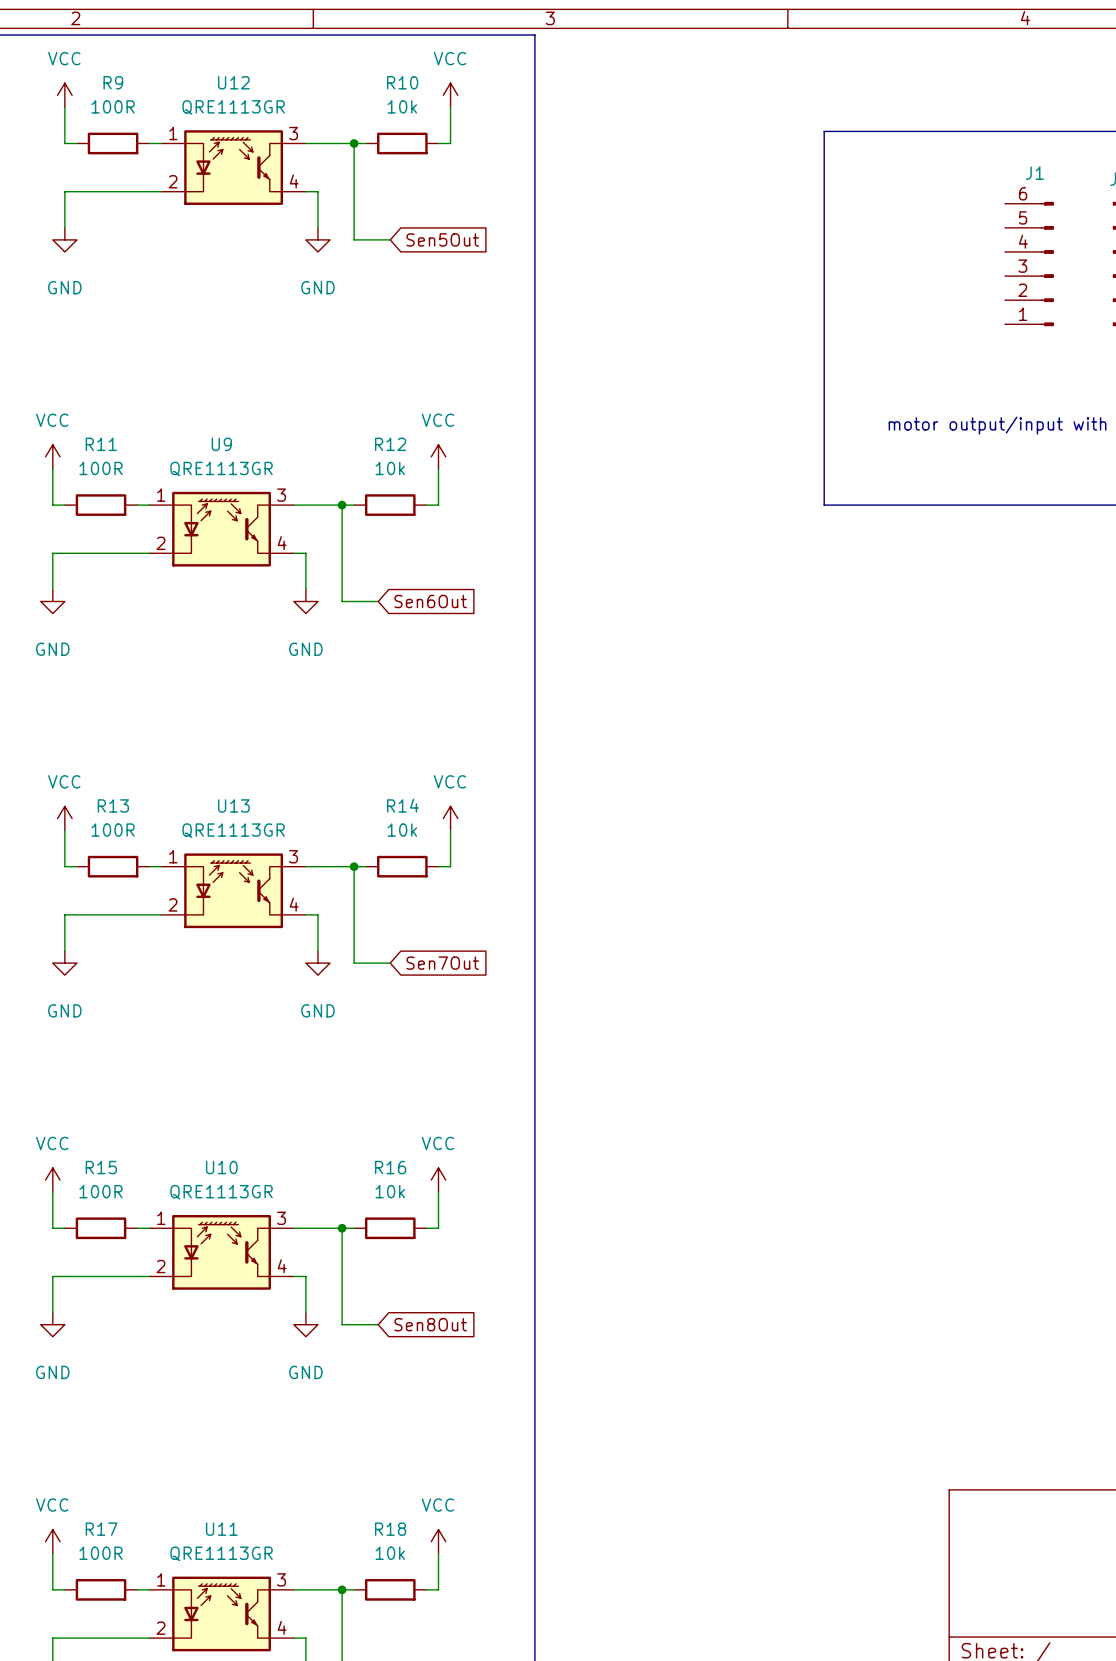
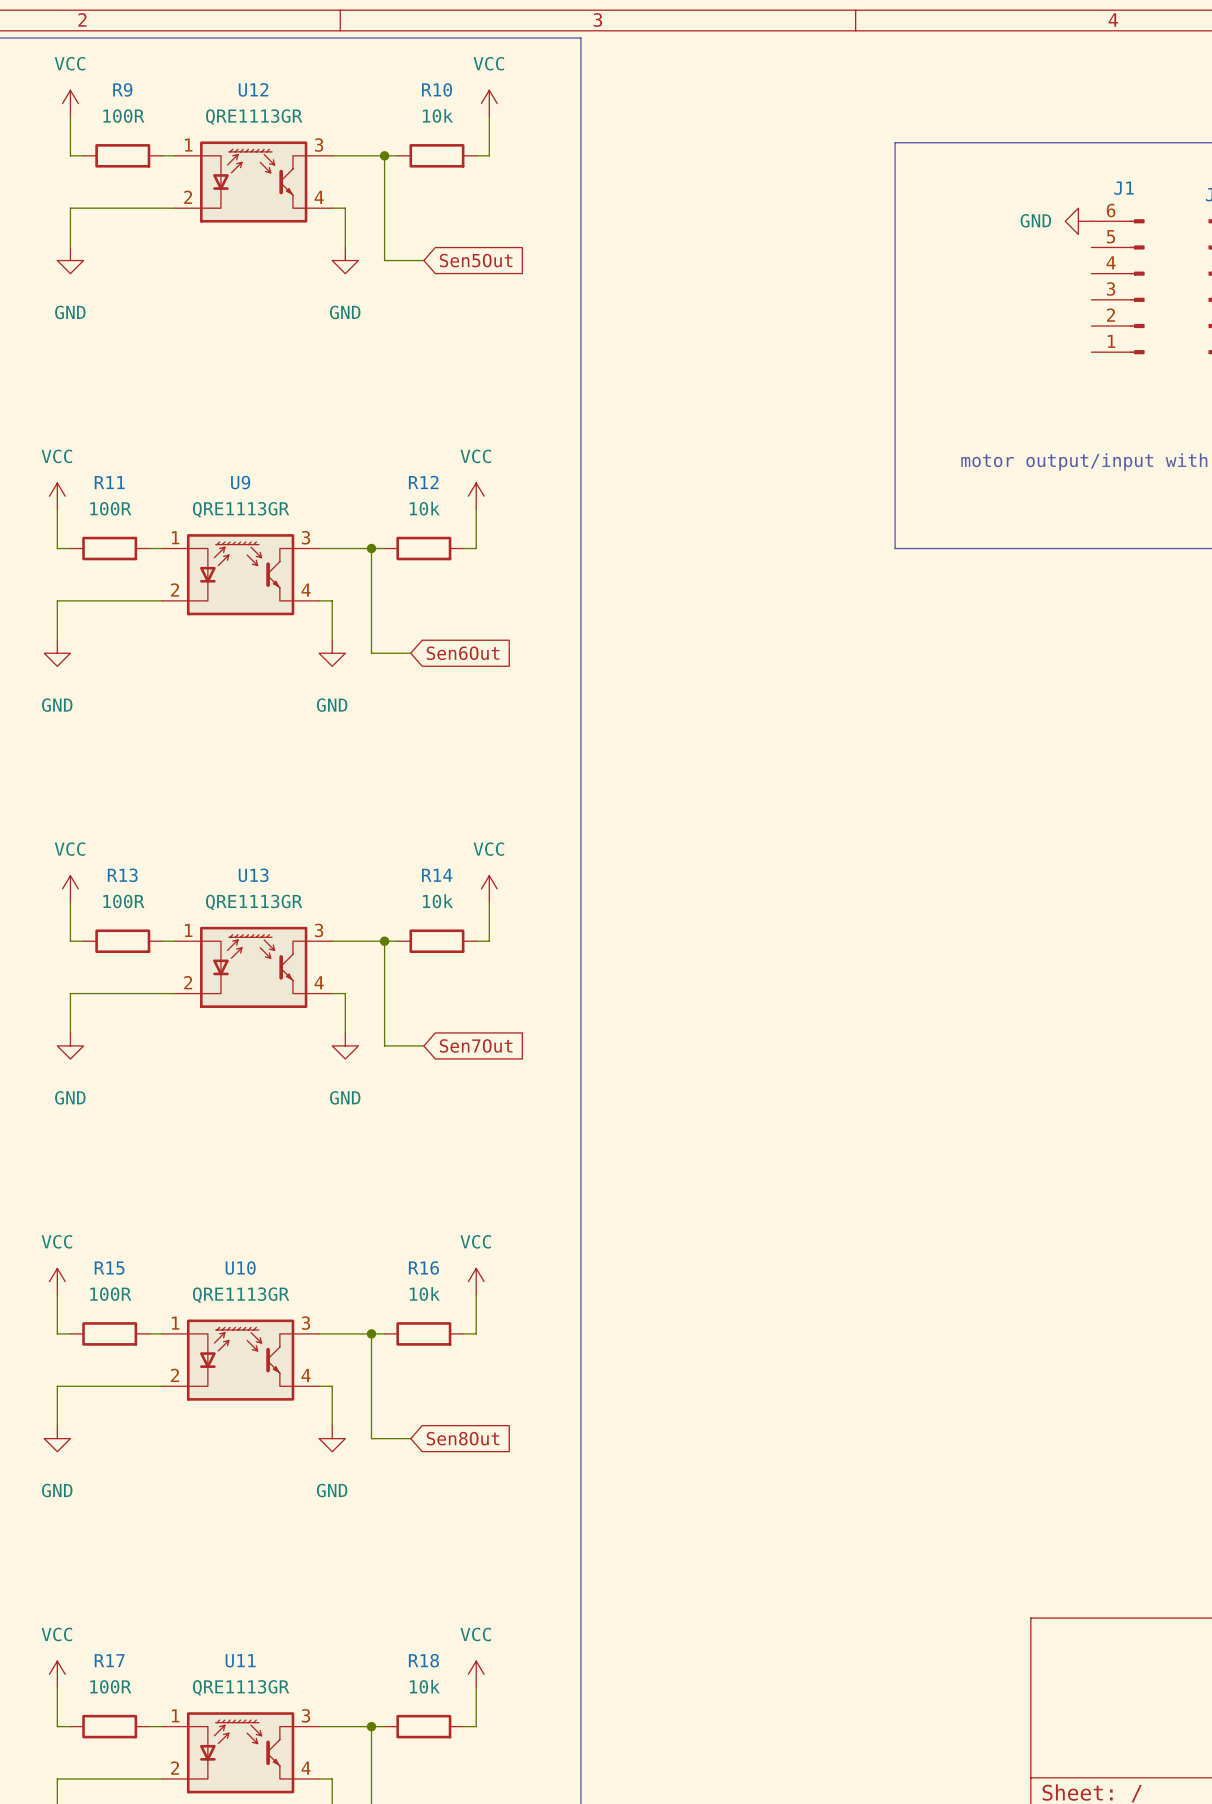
power symbol: none -> GND (1078, 221)

